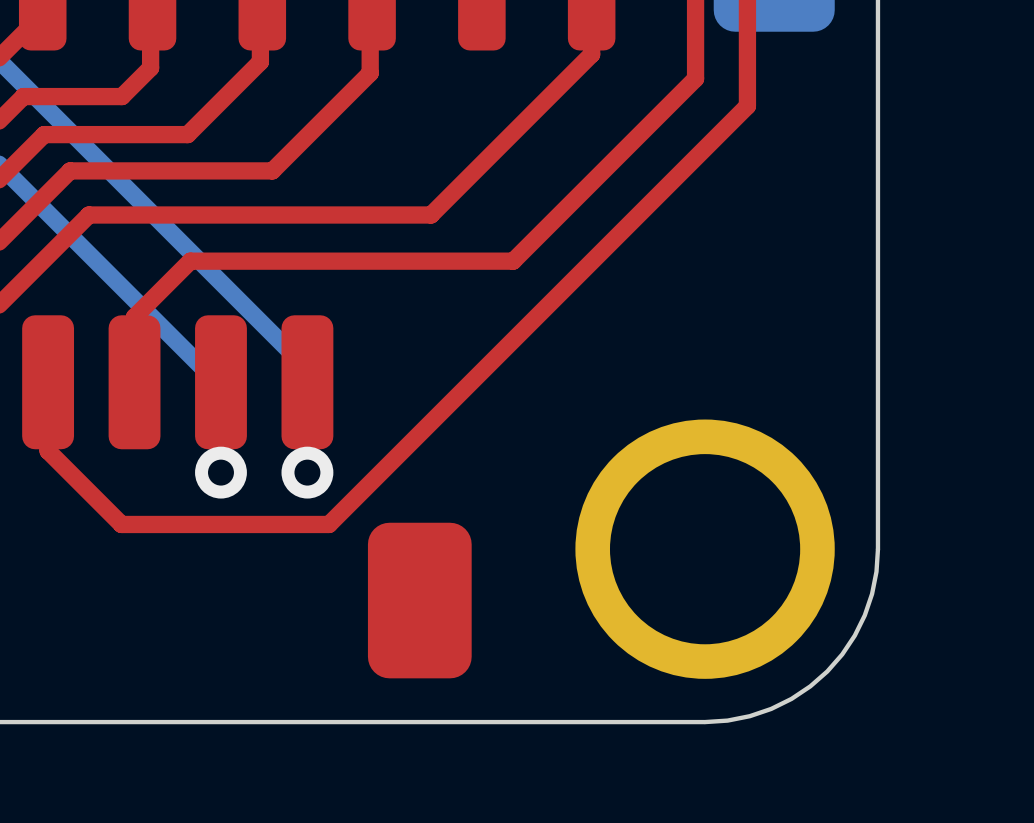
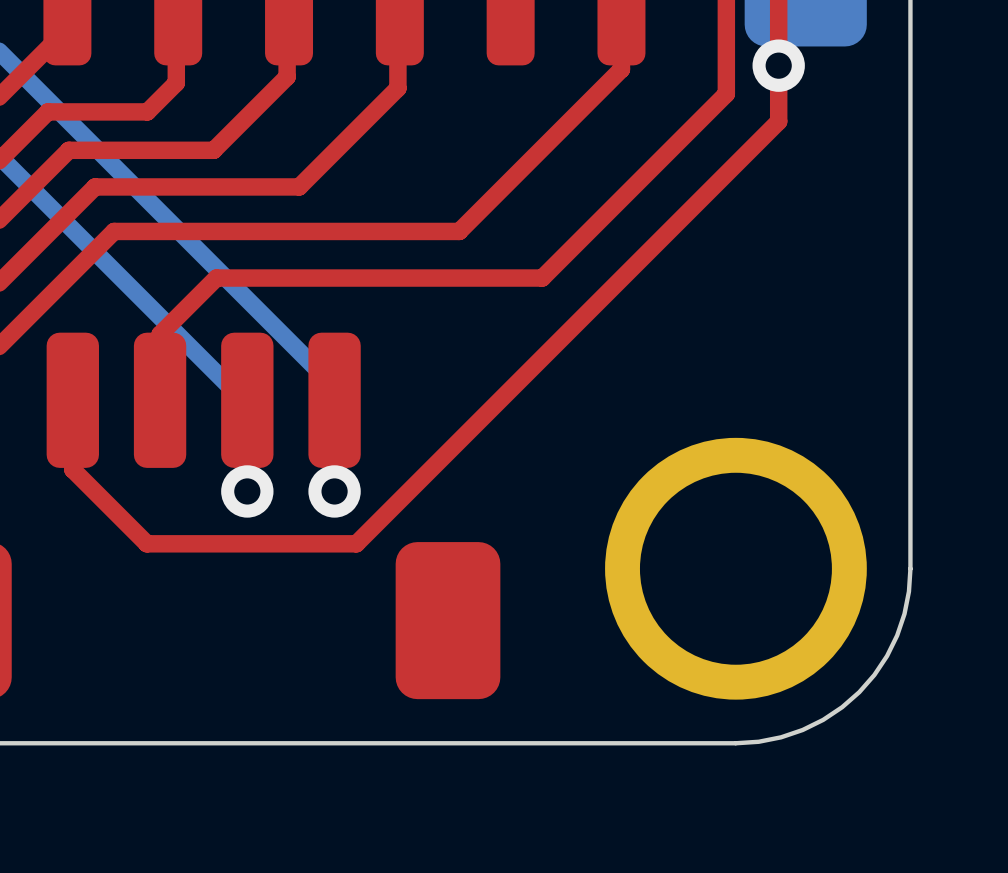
via: none -> (778, 65)

